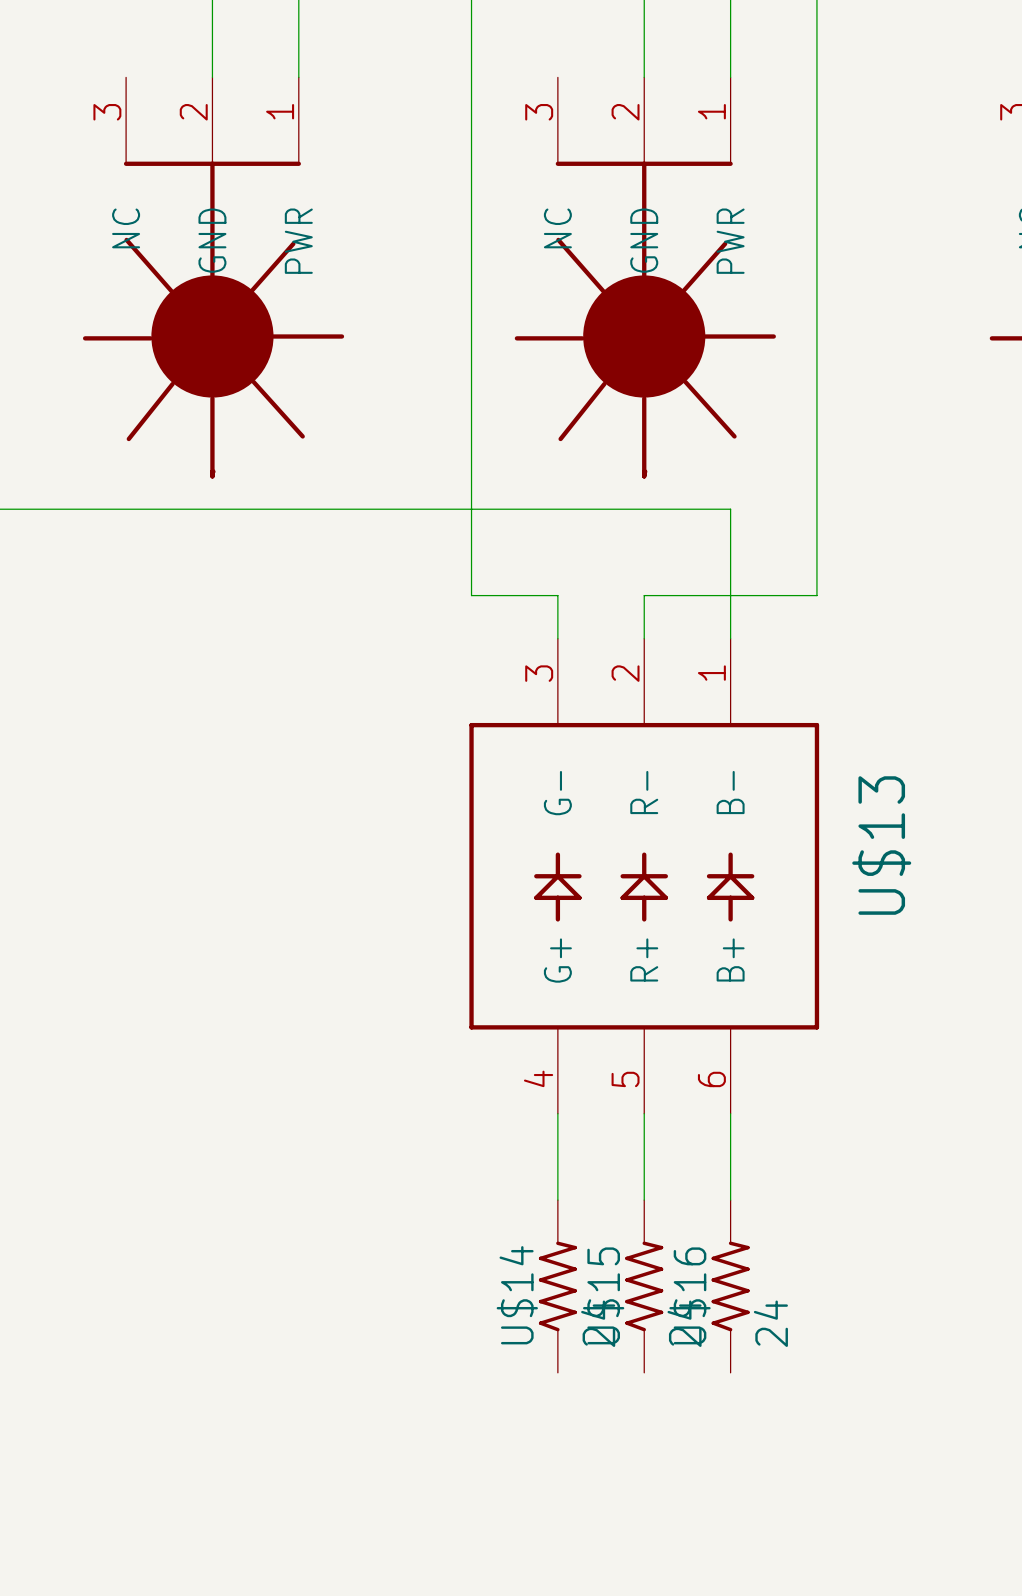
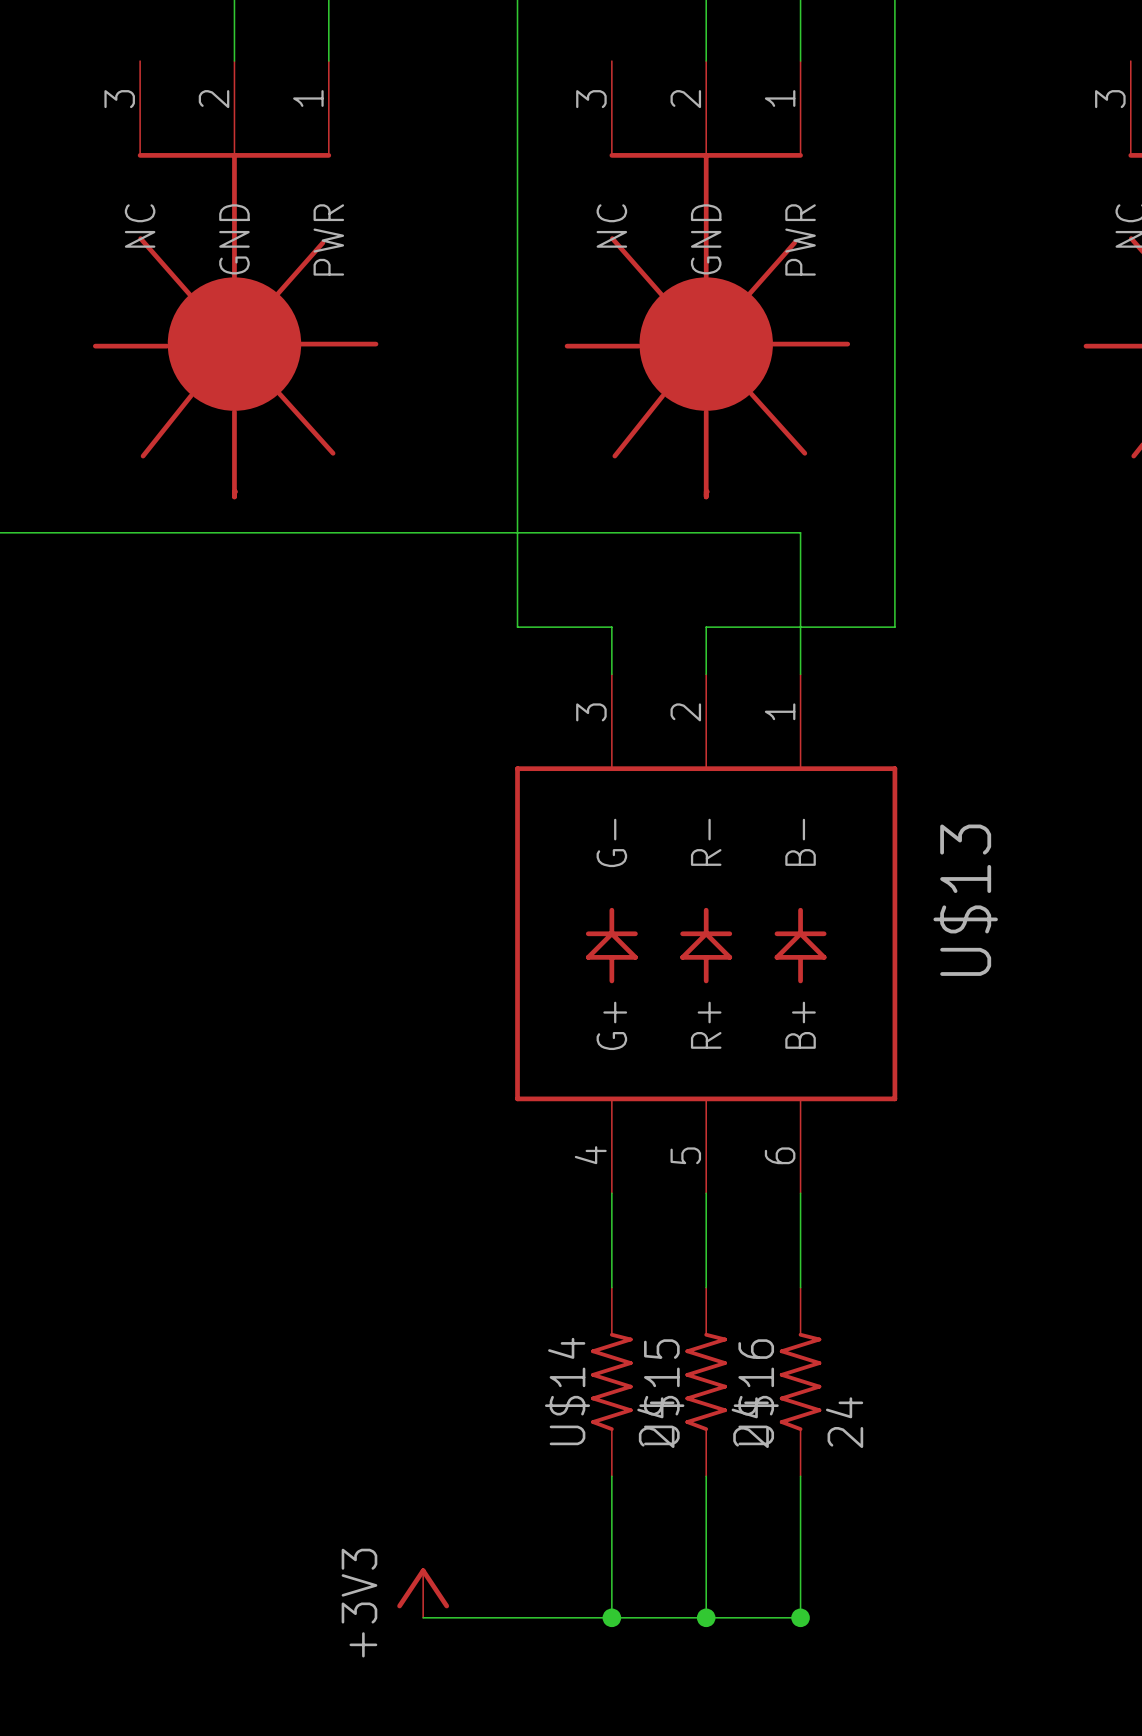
wire: none -> (611, 1476) (611, 1617)
wire: none -> (706, 1476) (706, 1617)
wire: none -> (800, 1476) (800, 1617) (423, 1617)
power symbol: none -> +3V3 (423, 1593)
junction: none -> (611, 1617)
junction: none -> (706, 1617)
junction: none -> (800, 1617)

